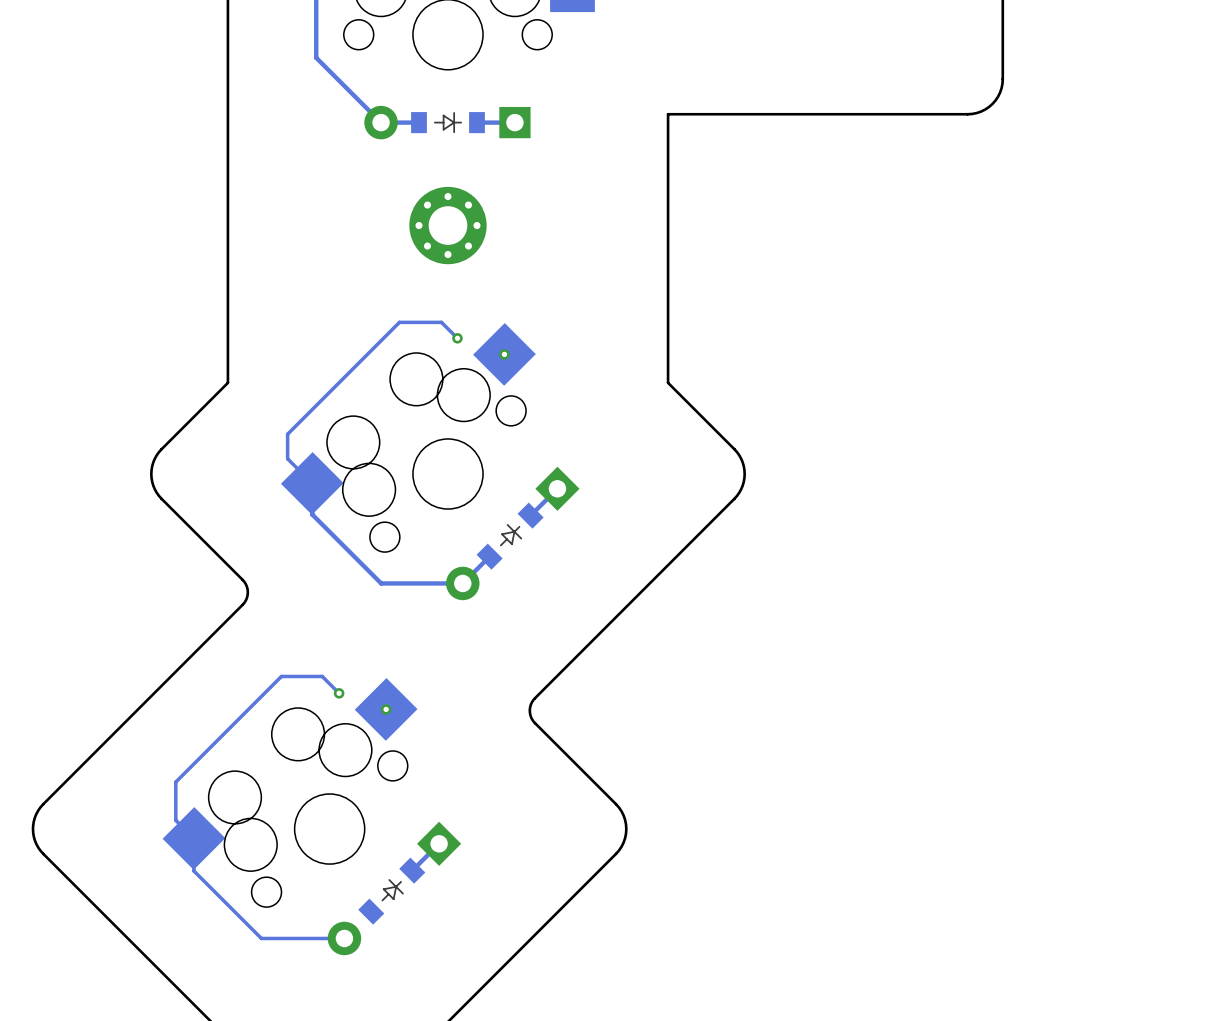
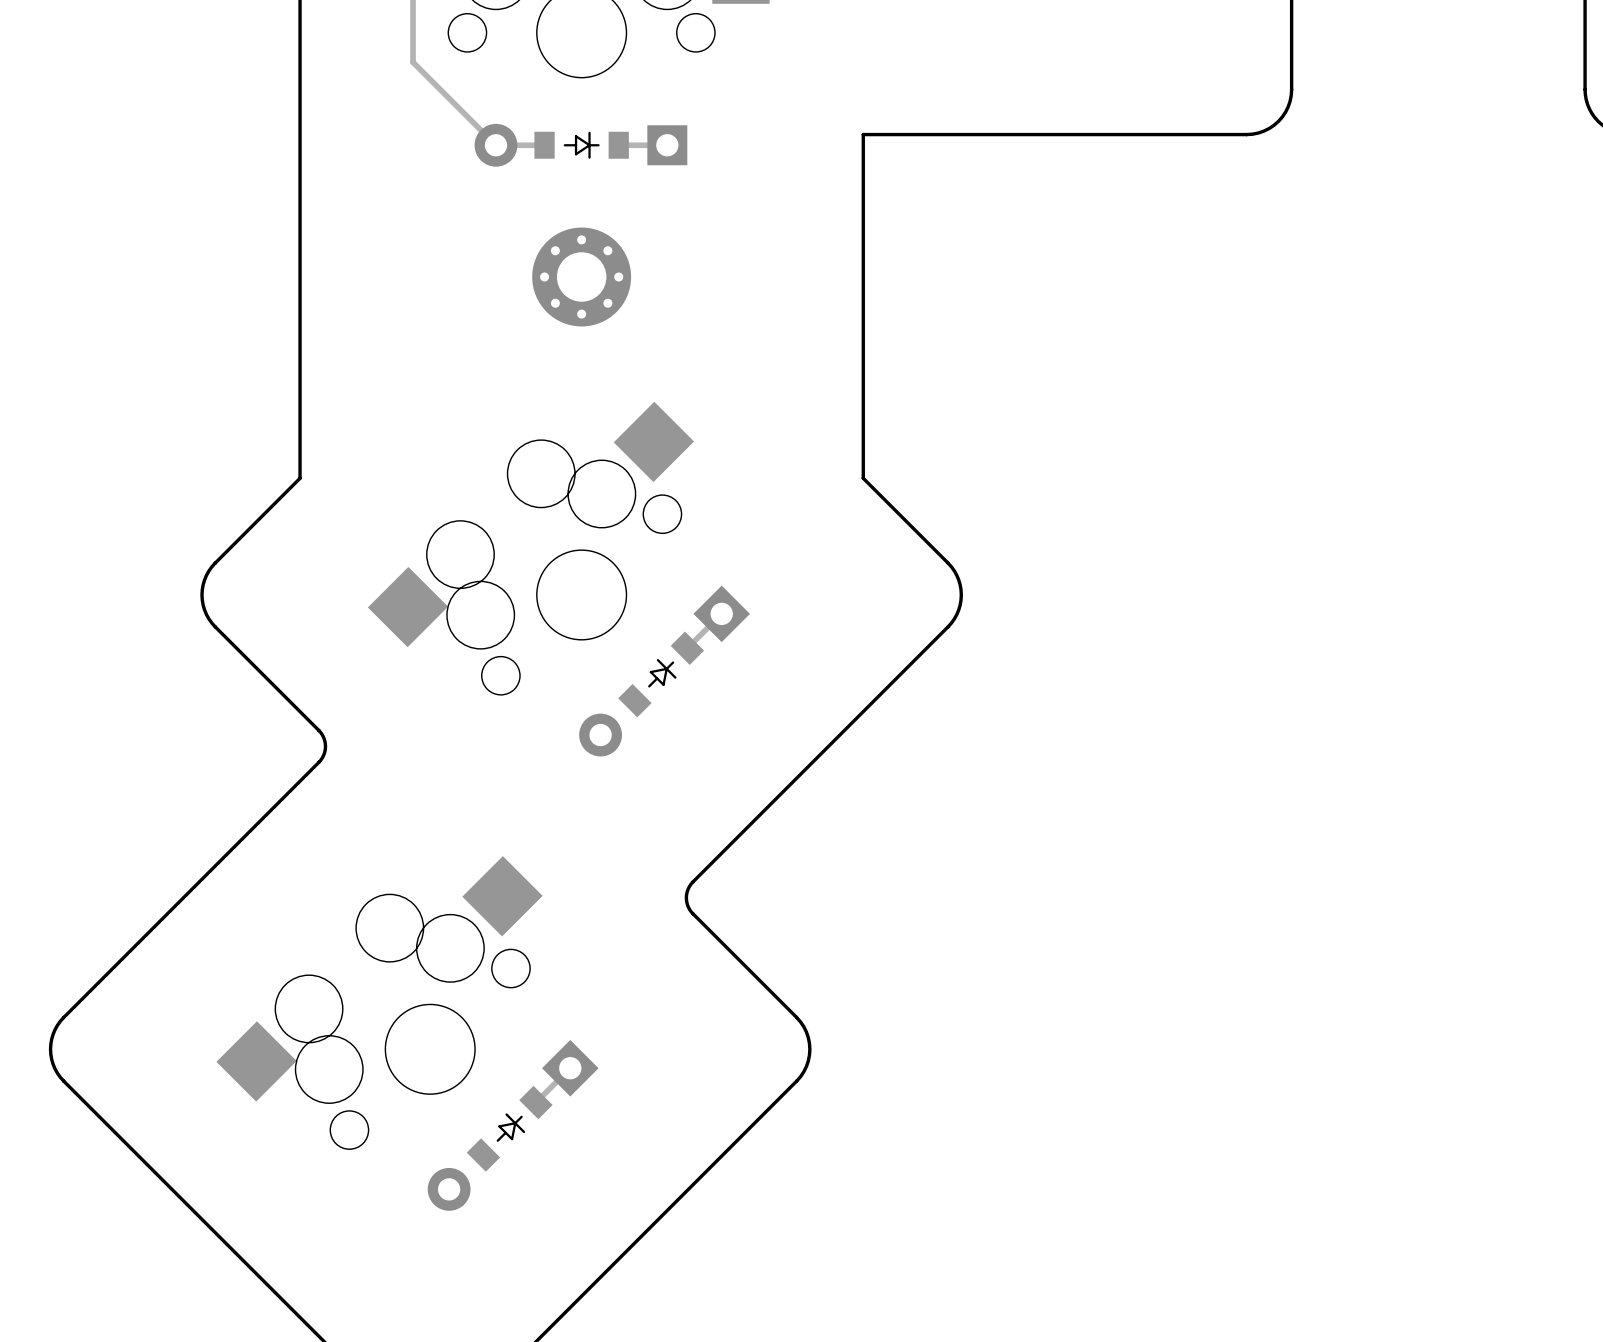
track: (457, 338) (441, 322) (399, 322) (287, 434) (287, 458) (312, 483) (312, 514) (381, 583) (462, 583) (489, 556) -> none
via: (457, 338) -> none
via: (504, 354) -> none
track: (339, 693) (322, 676) (281, 676) (175, 782) (175, 820) (193, 838) (193, 871) (261, 938) (344, 938) -> none
via: (339, 693) -> none
via: (386, 709) -> none

